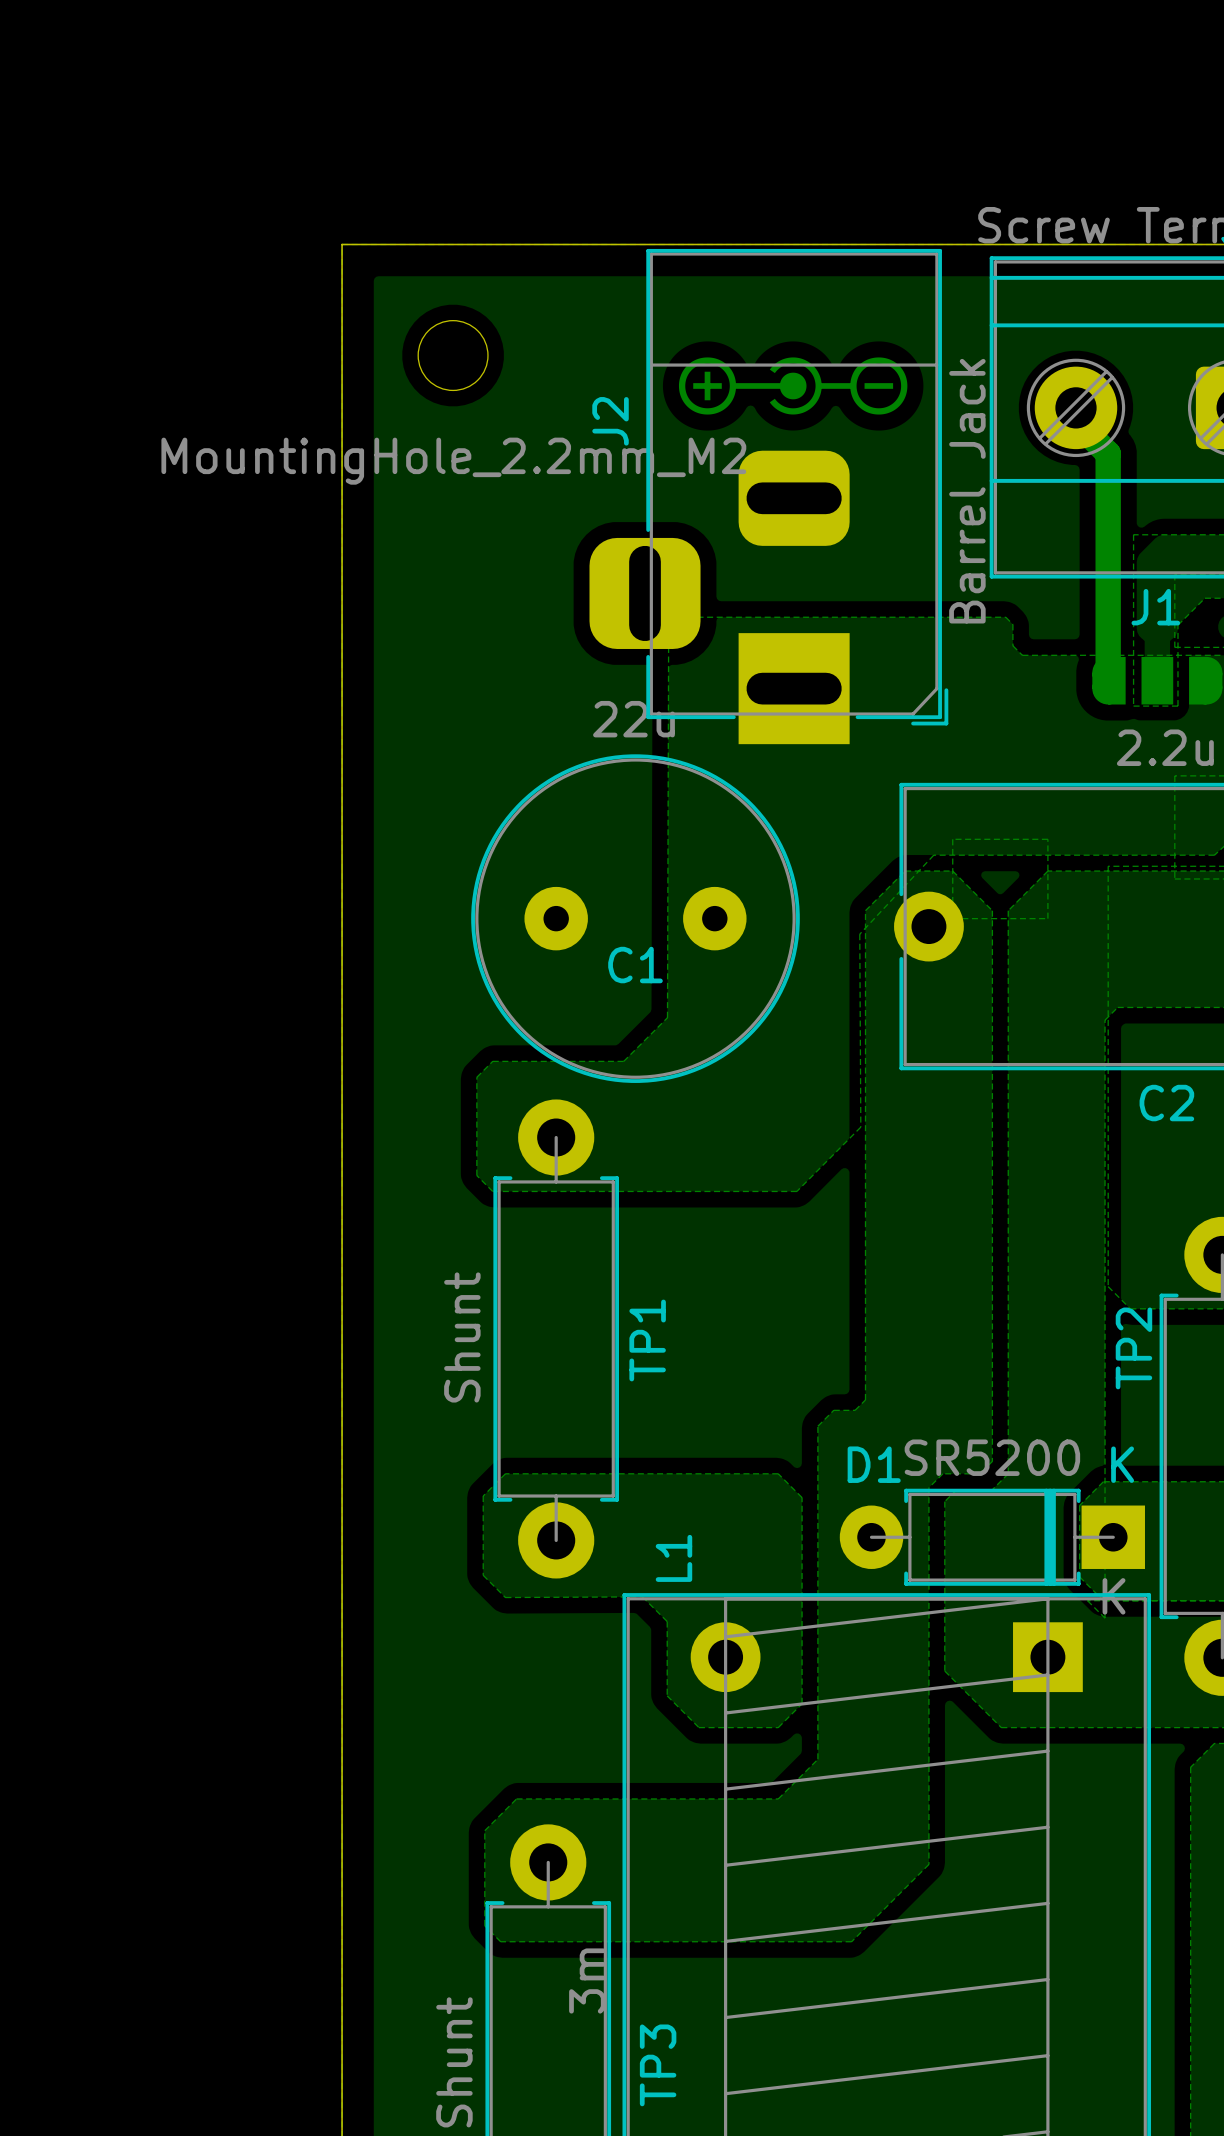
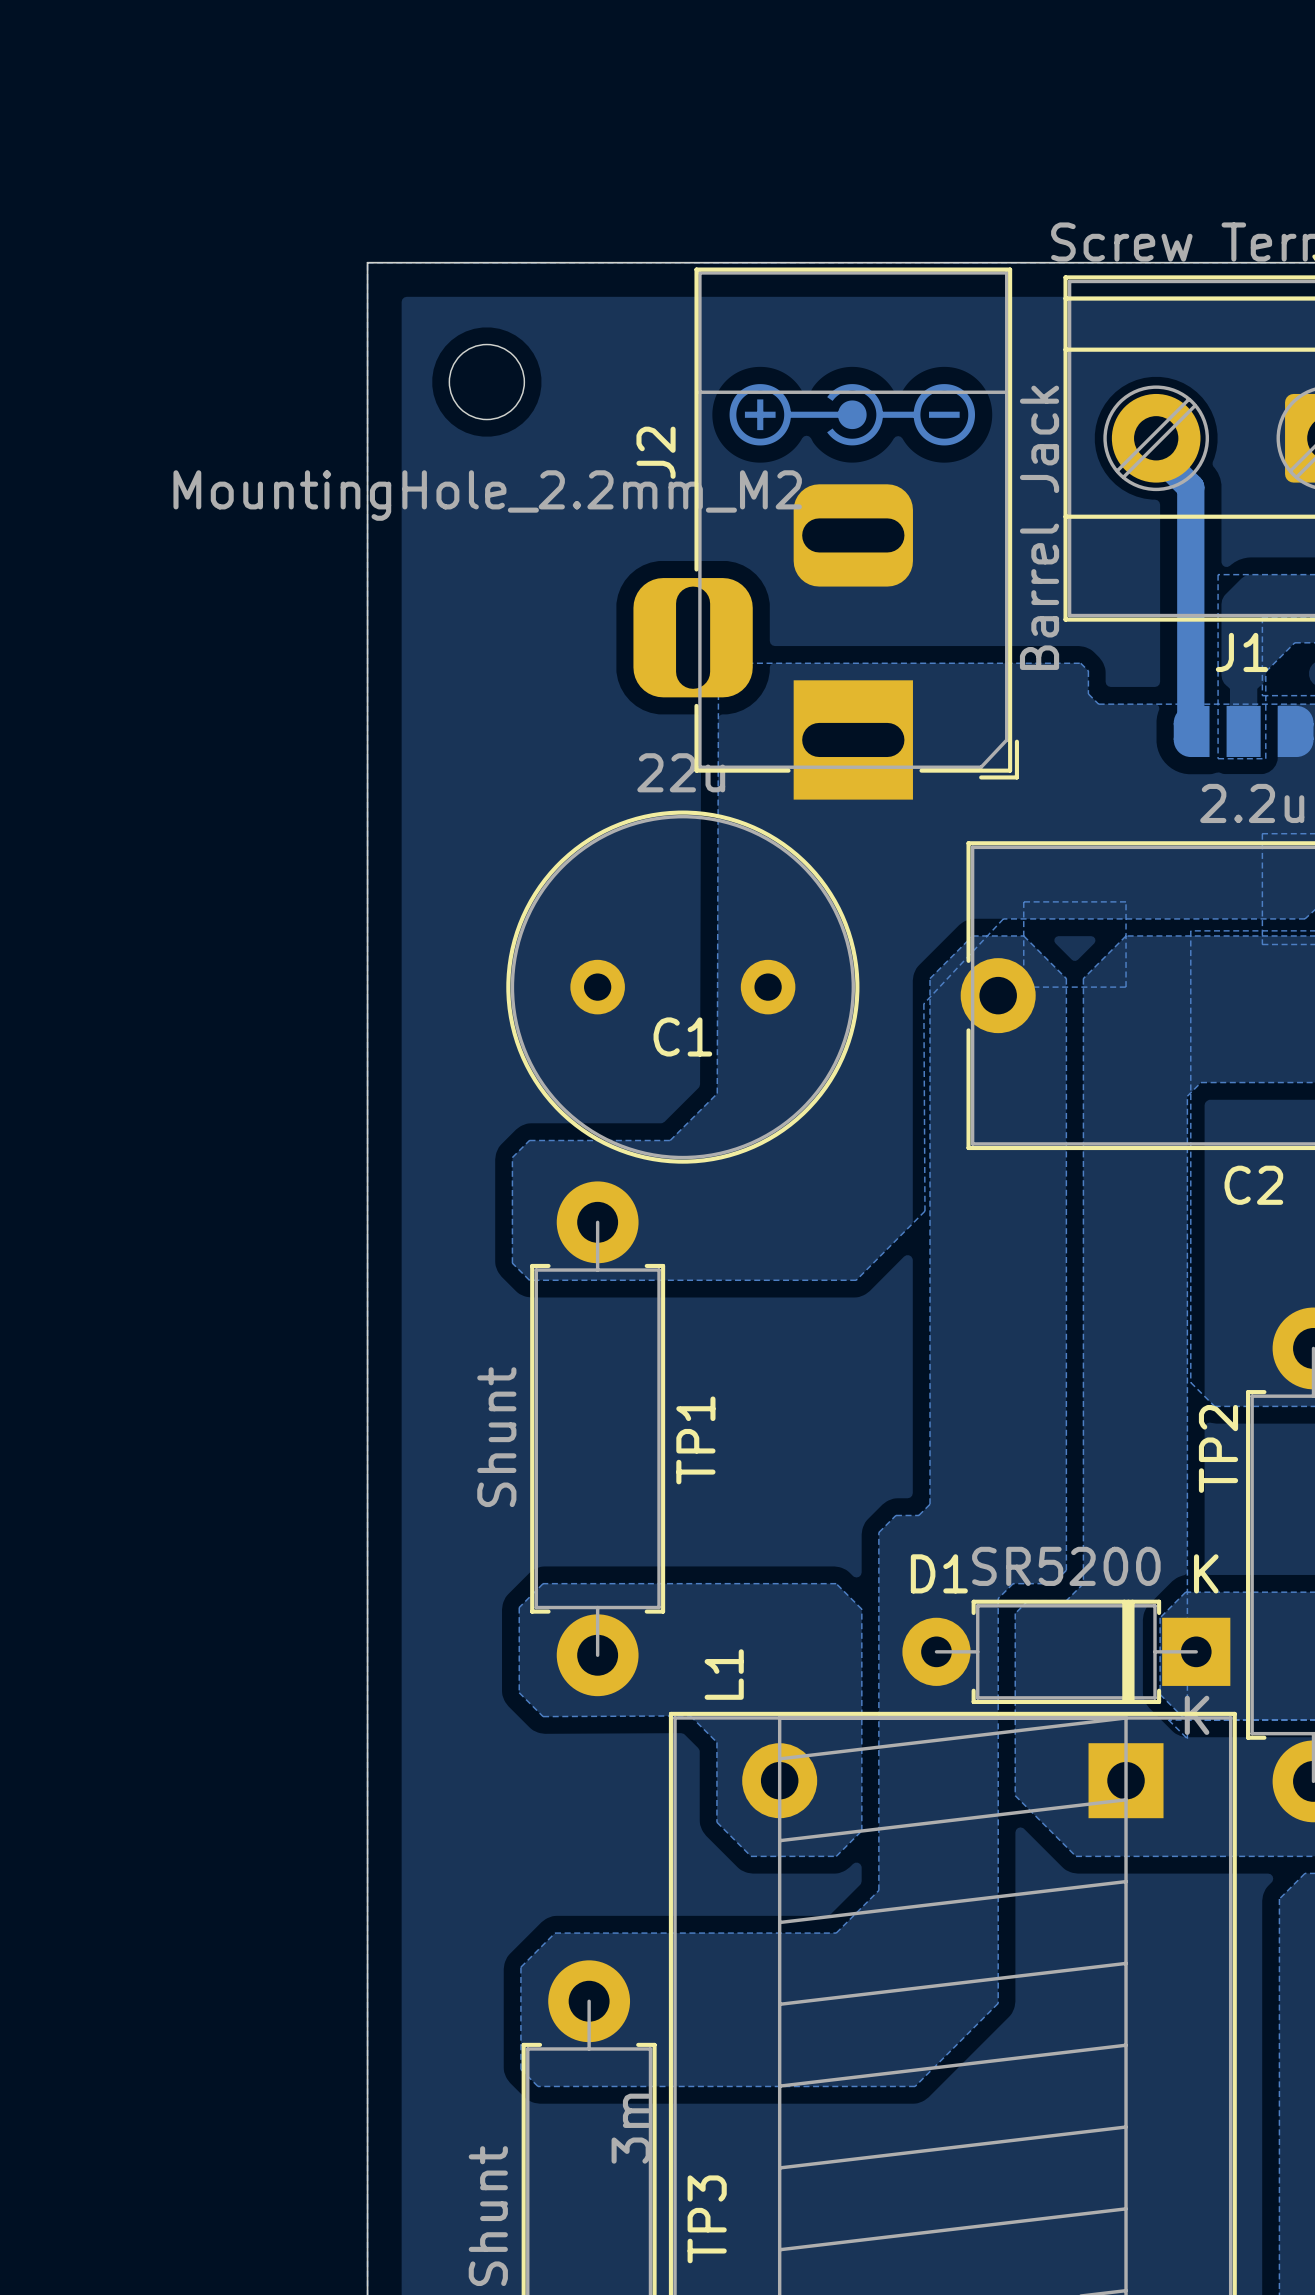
C1 footprint: [471, 754, 800, 1083] -> [506, 810, 860, 1164]

